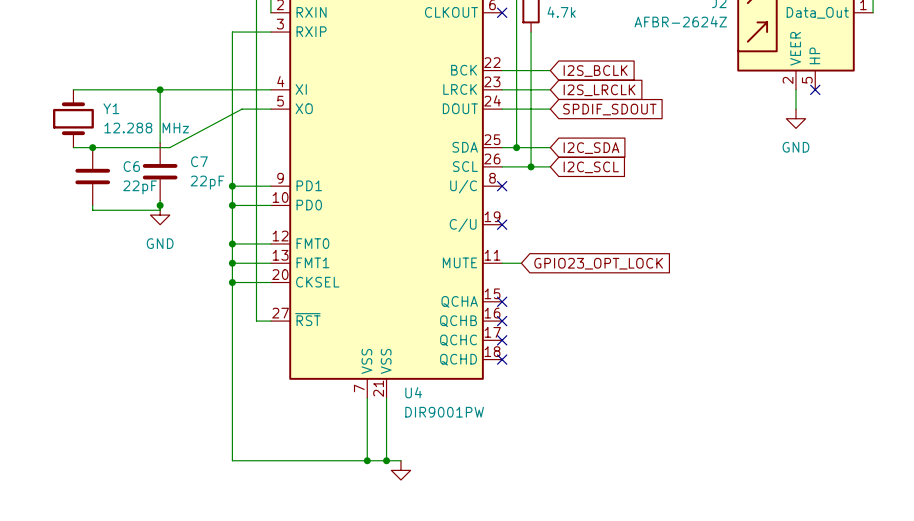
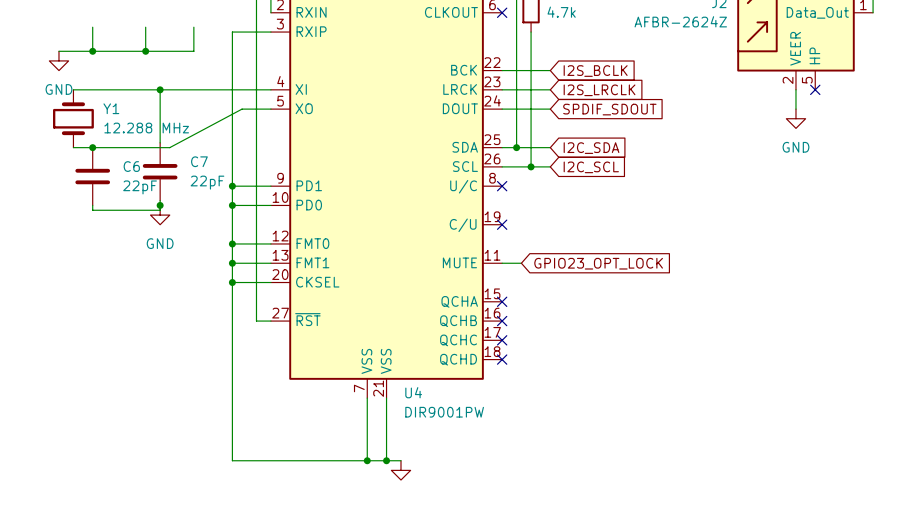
wire: none -> (92, 27) (92, 51)
wire: none -> (145, 27) (145, 51)
wire: none -> (193, 27) (193, 51) (58, 51)
junction: none -> (92, 51)
junction: none -> (145, 51)
power symbol: none -> GND (58, 60)

